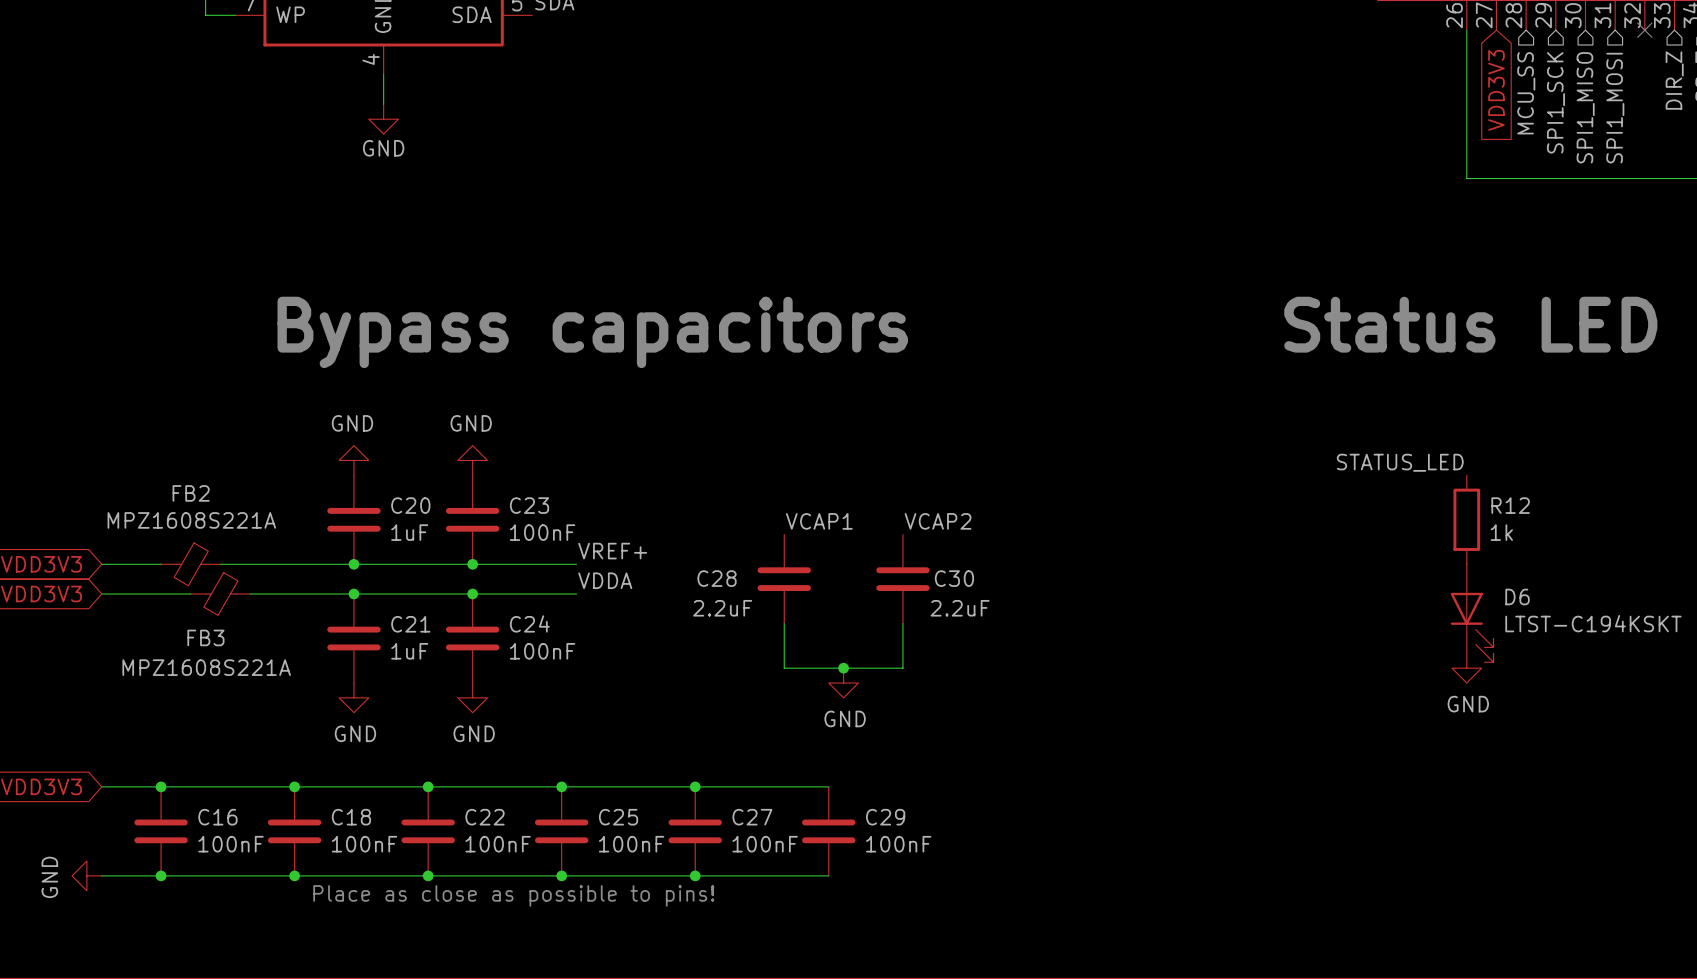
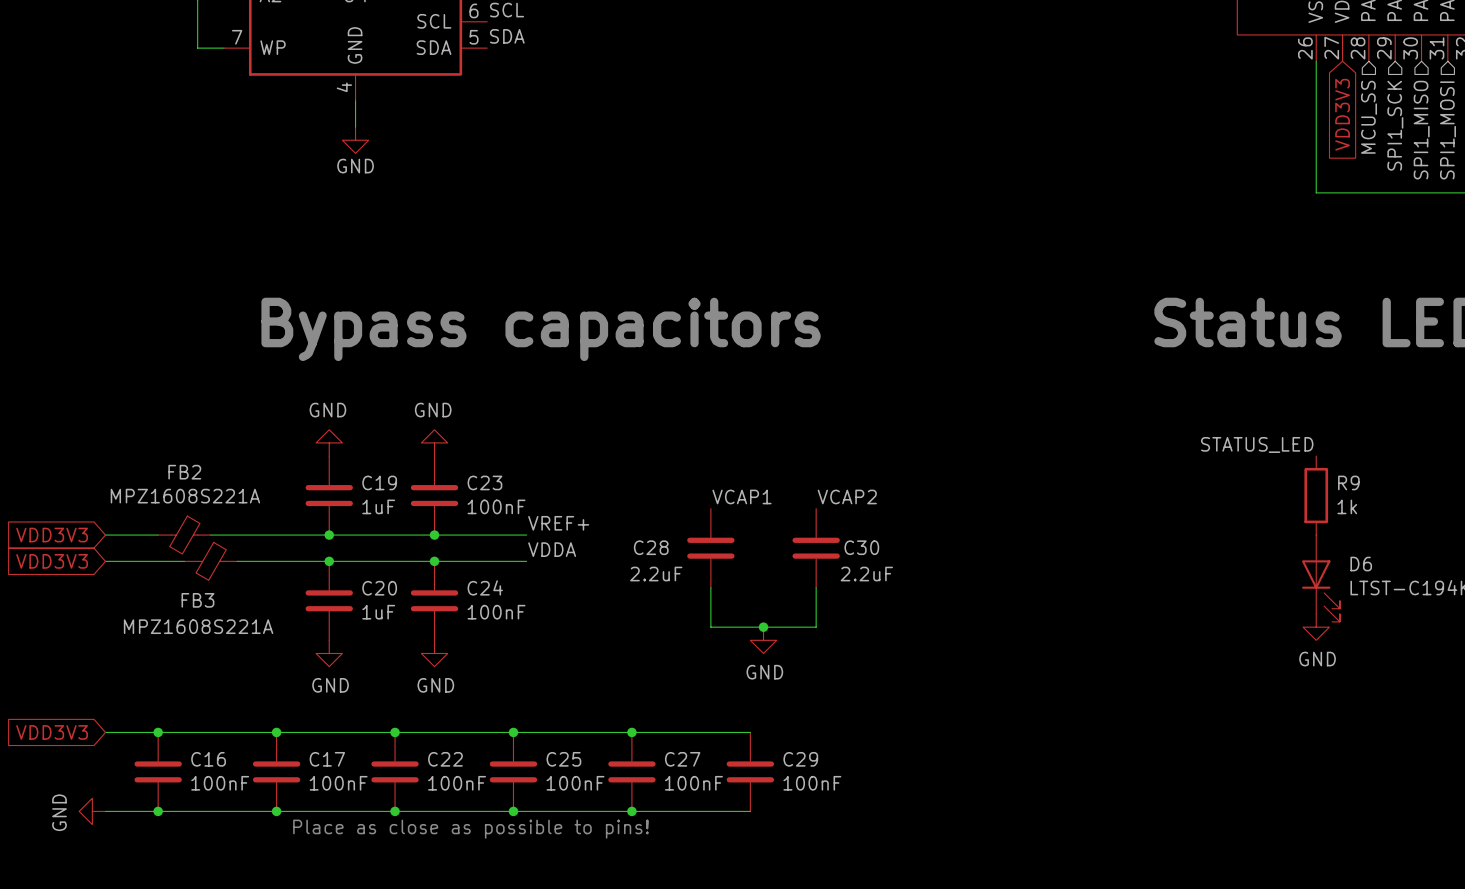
C20 name: C20 (410, 505) -> C19 (379, 482)
R12 name: R12 (1510, 505) -> R9 (1348, 482)
C21 name: C21 (410, 624) -> C20 (379, 588)
C18 name: C18 (351, 817) -> C17 (327, 759)

